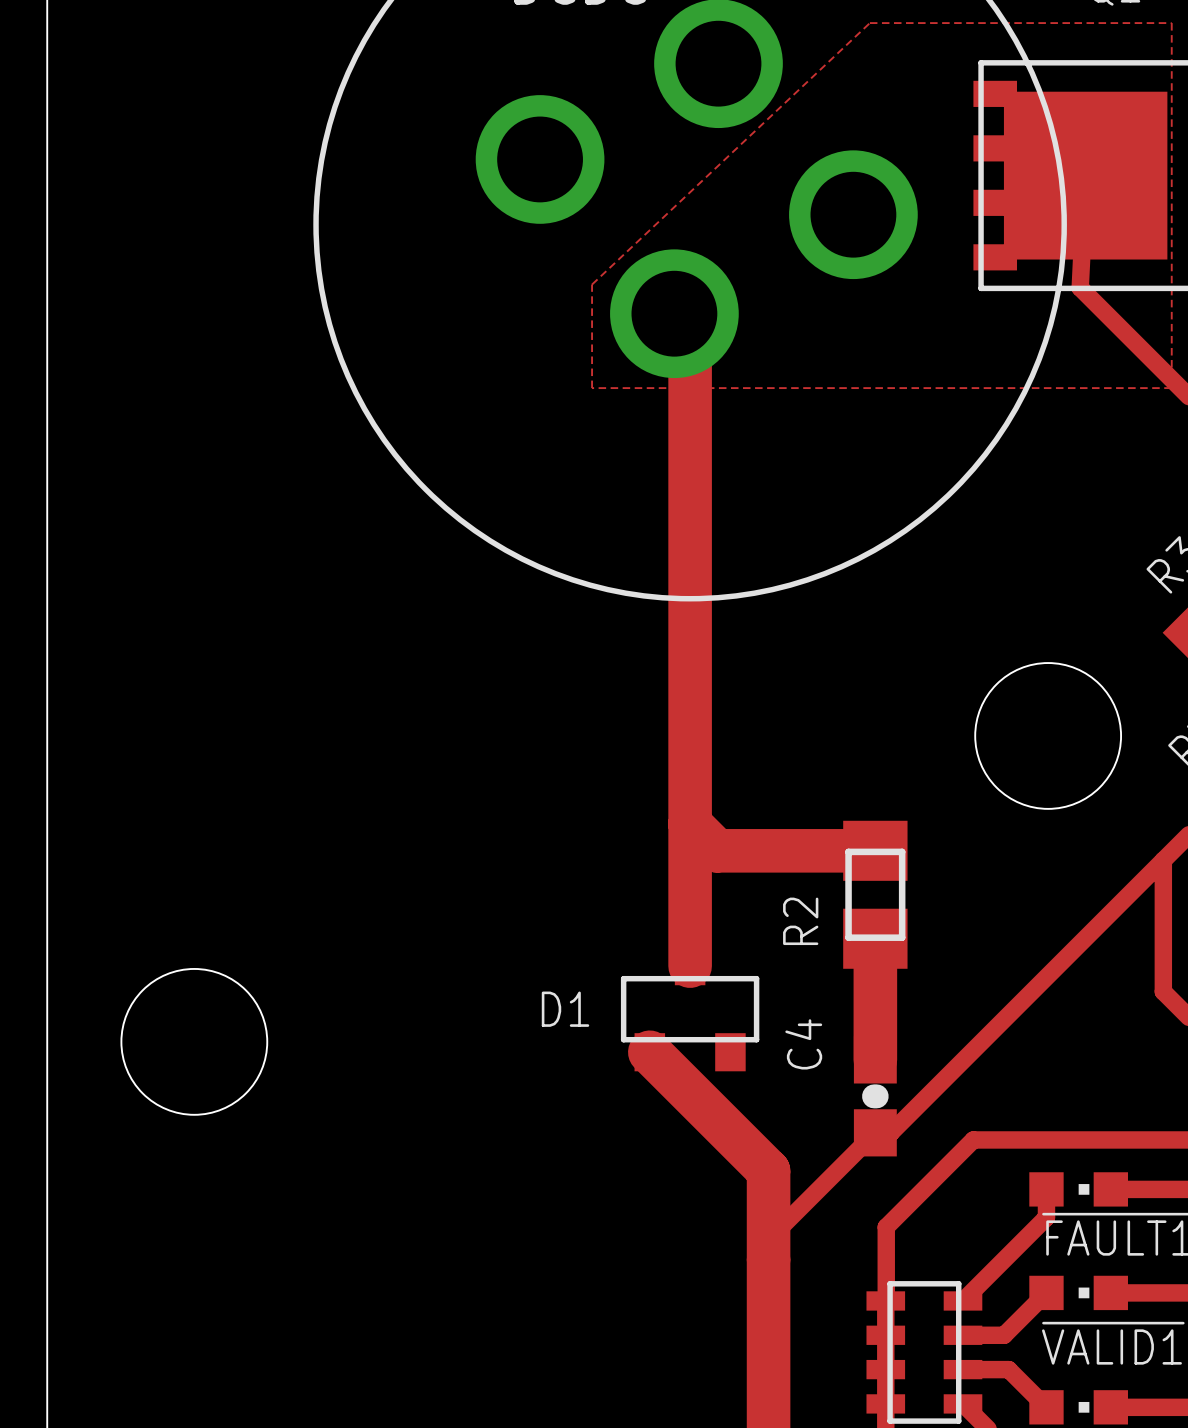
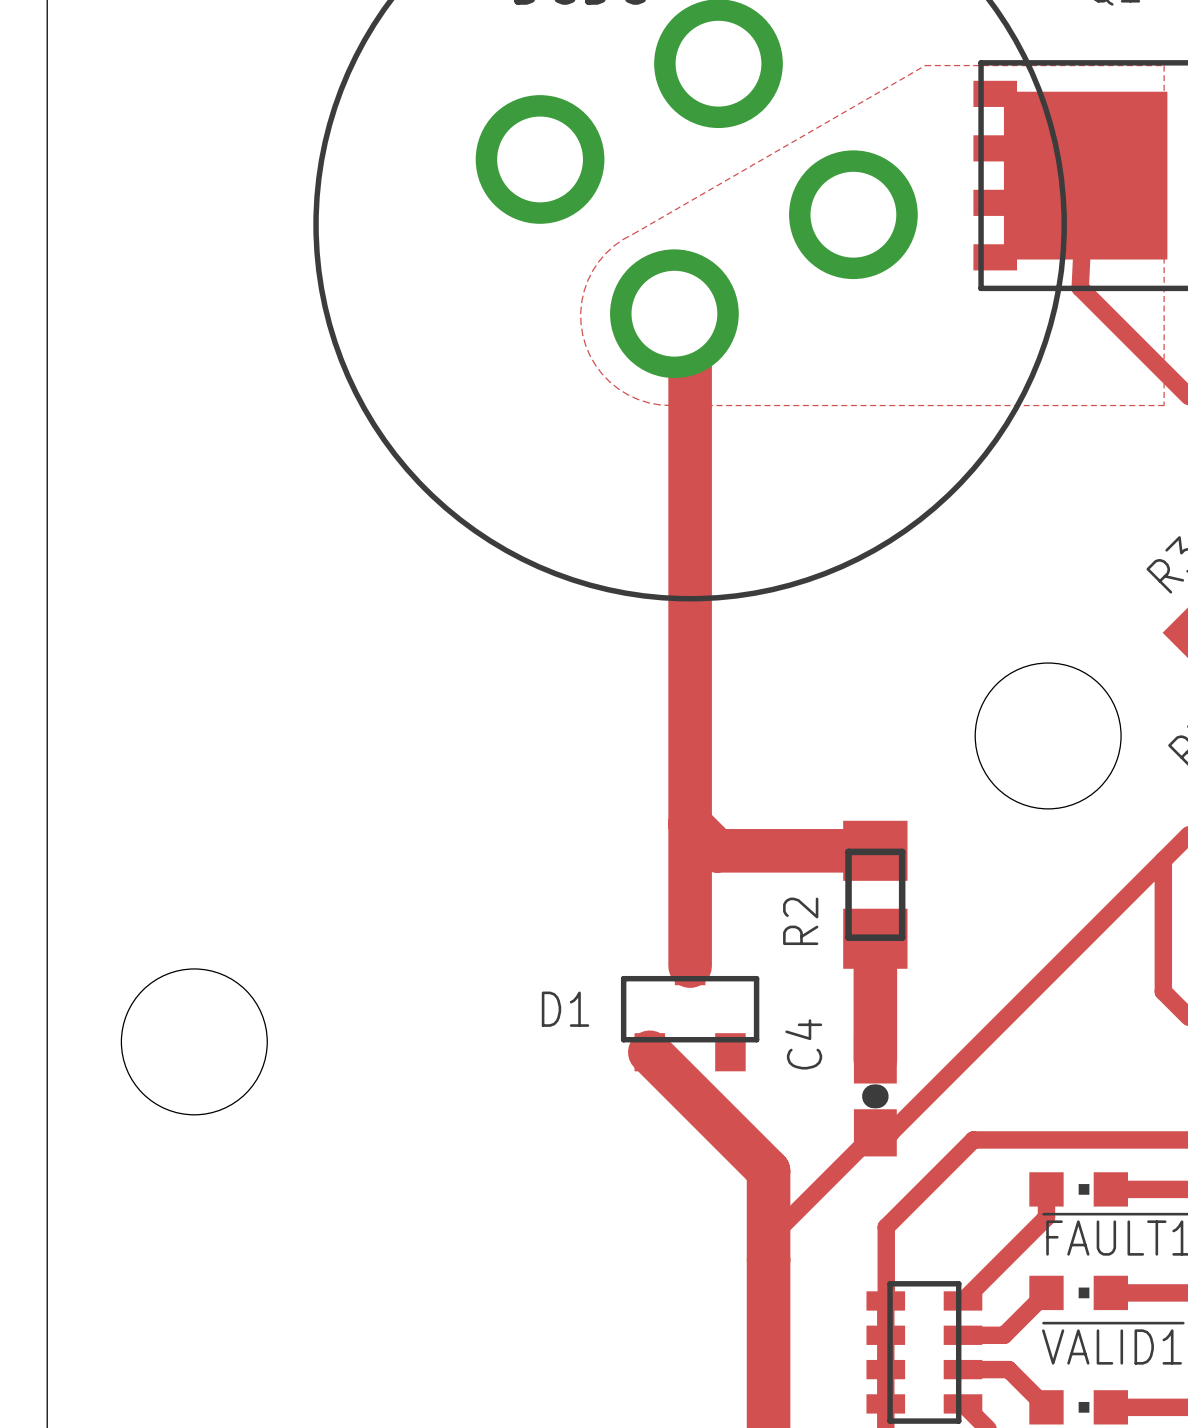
top zone outline: (869, 23) (592, 284) (592, 388) (1171, 388) (1171, 23) (869, 23) -> (925, 65) (623, 239) (606, 252) (592, 270) (584, 290) (581, 323) (589, 355) (609, 381) (637, 399) (670, 405) (1164, 405) (1164, 65) (925, 65)

